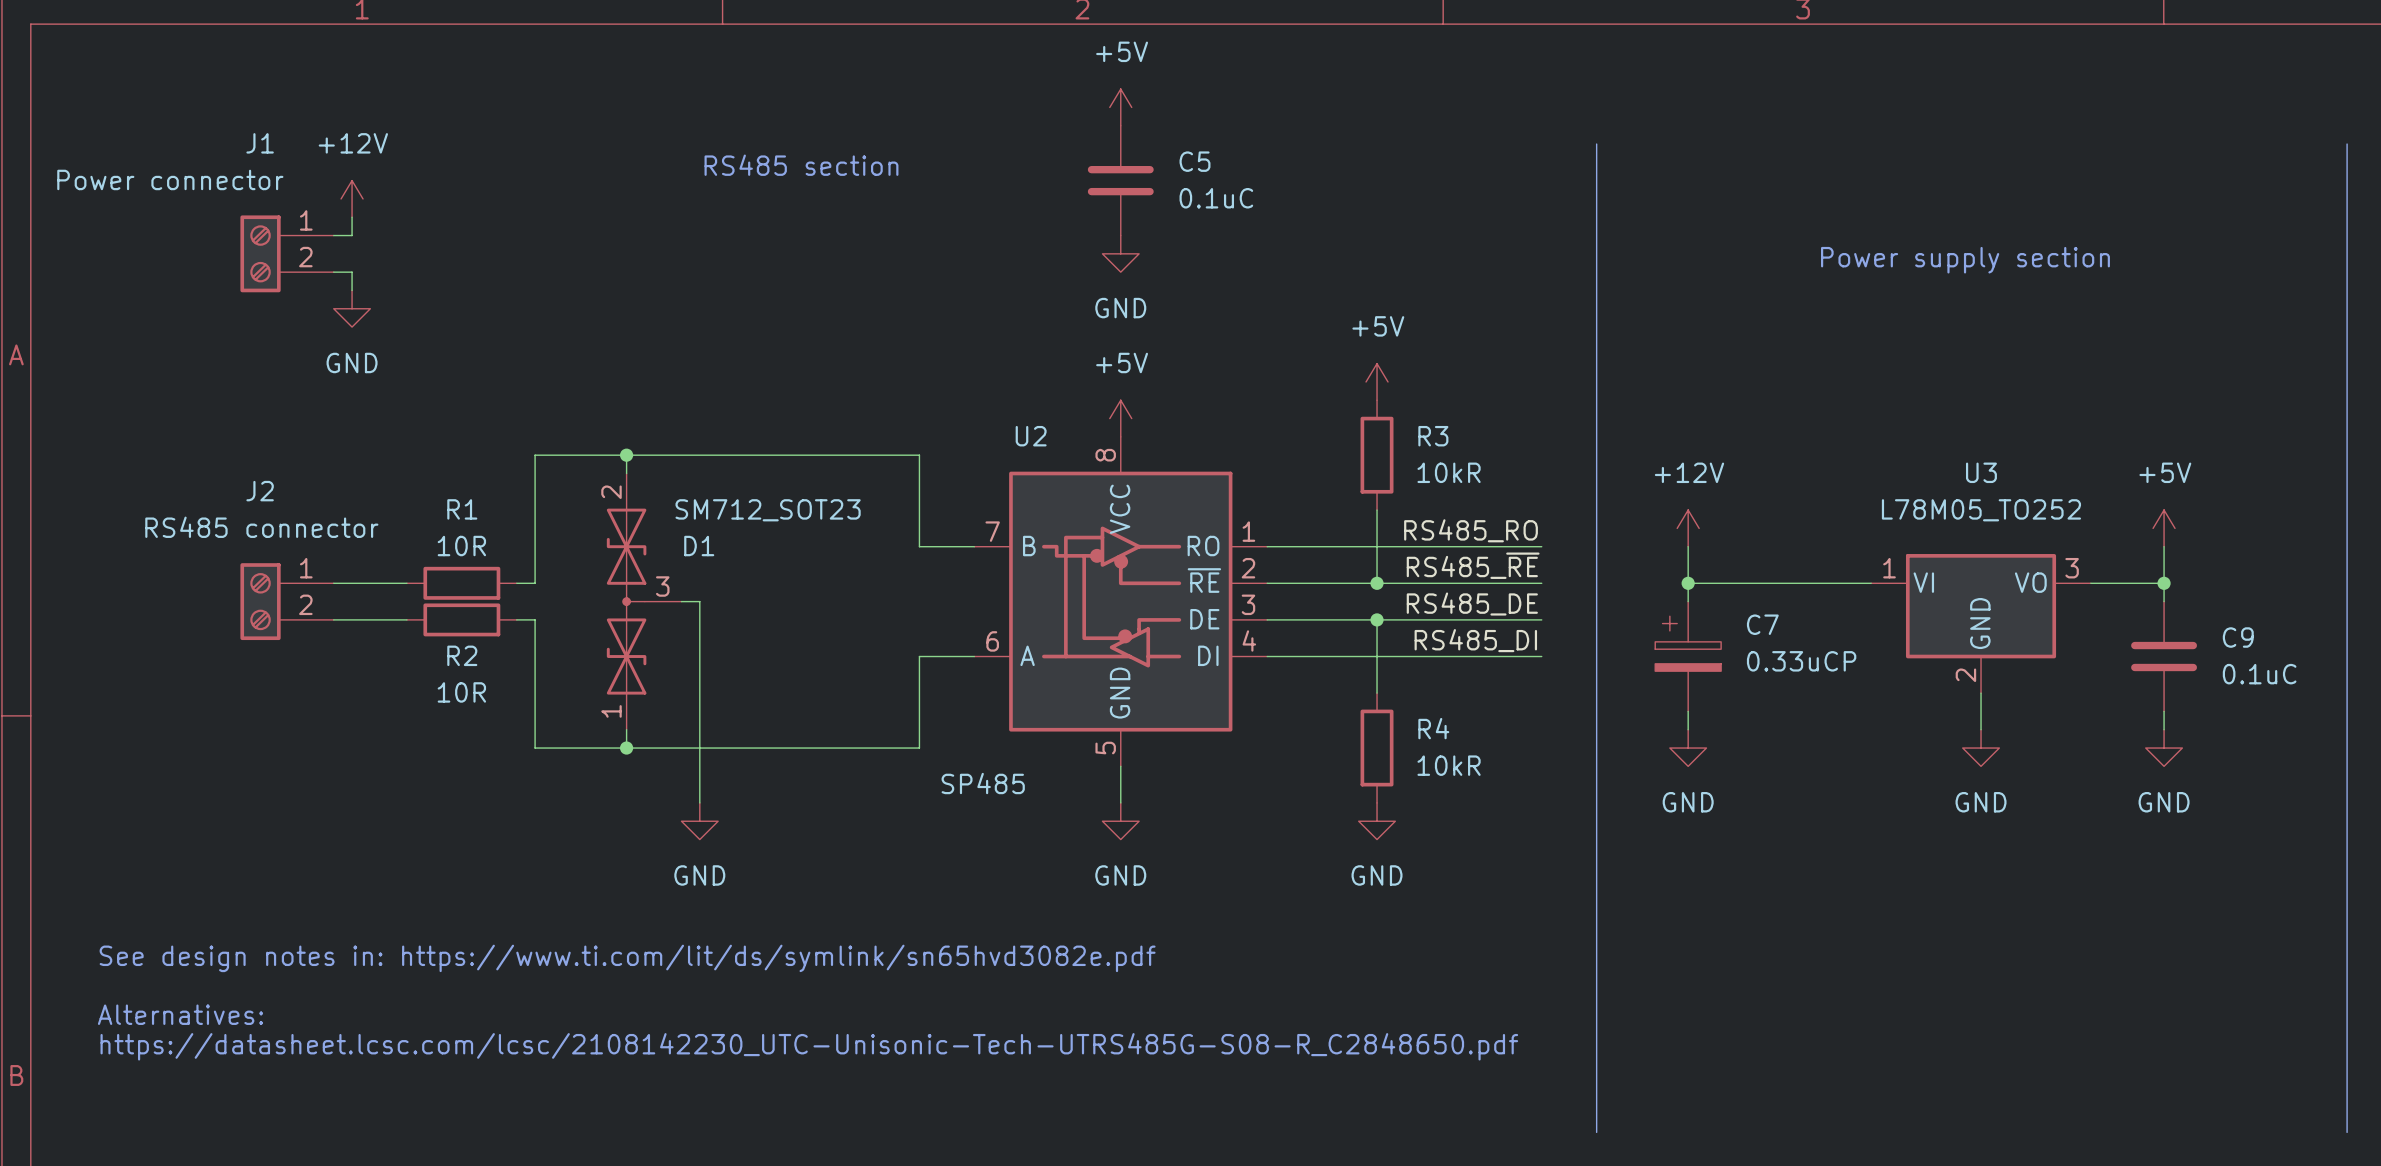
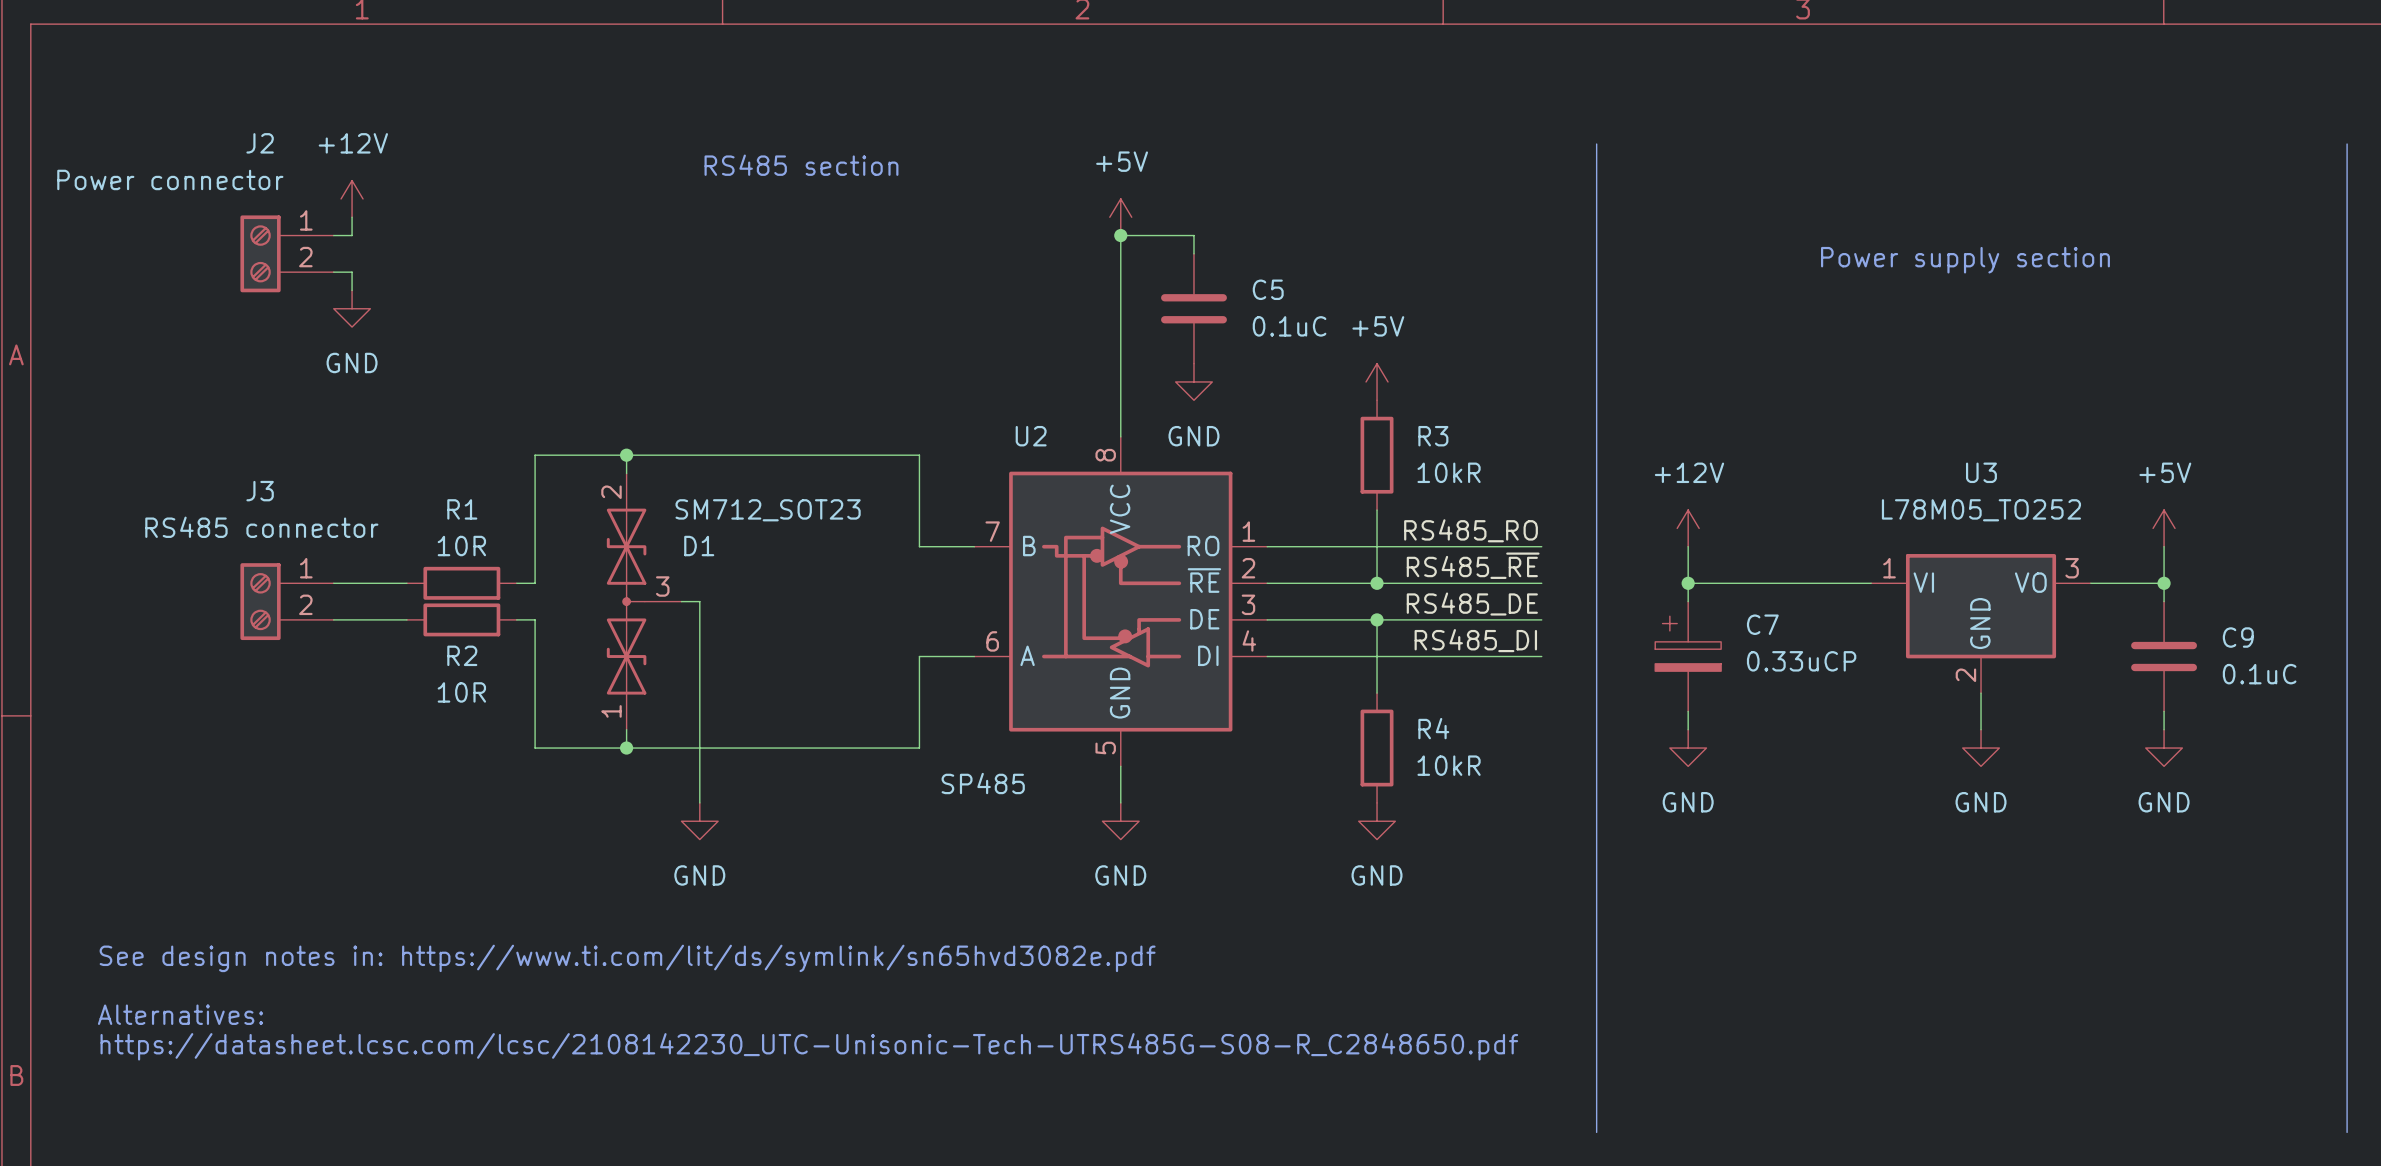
power symbol: +5V (1120, 107) -> none
J1 name: J1 (260, 143) -> J2 (260, 143)
C5 position: (1120, 180) -> (1193, 308)
power symbol: none -> +5V (1120, 217)
junction: none -> (1120, 235)
power symbol position: GND (1120, 253) -> GND (1193, 381)
wire: none -> (1193, 253) (1193, 235) (1120, 235) (1120, 436)
power symbol: +5V (1120, 418) -> none
J2 name: J2 (260, 491) -> J3 (260, 491)

